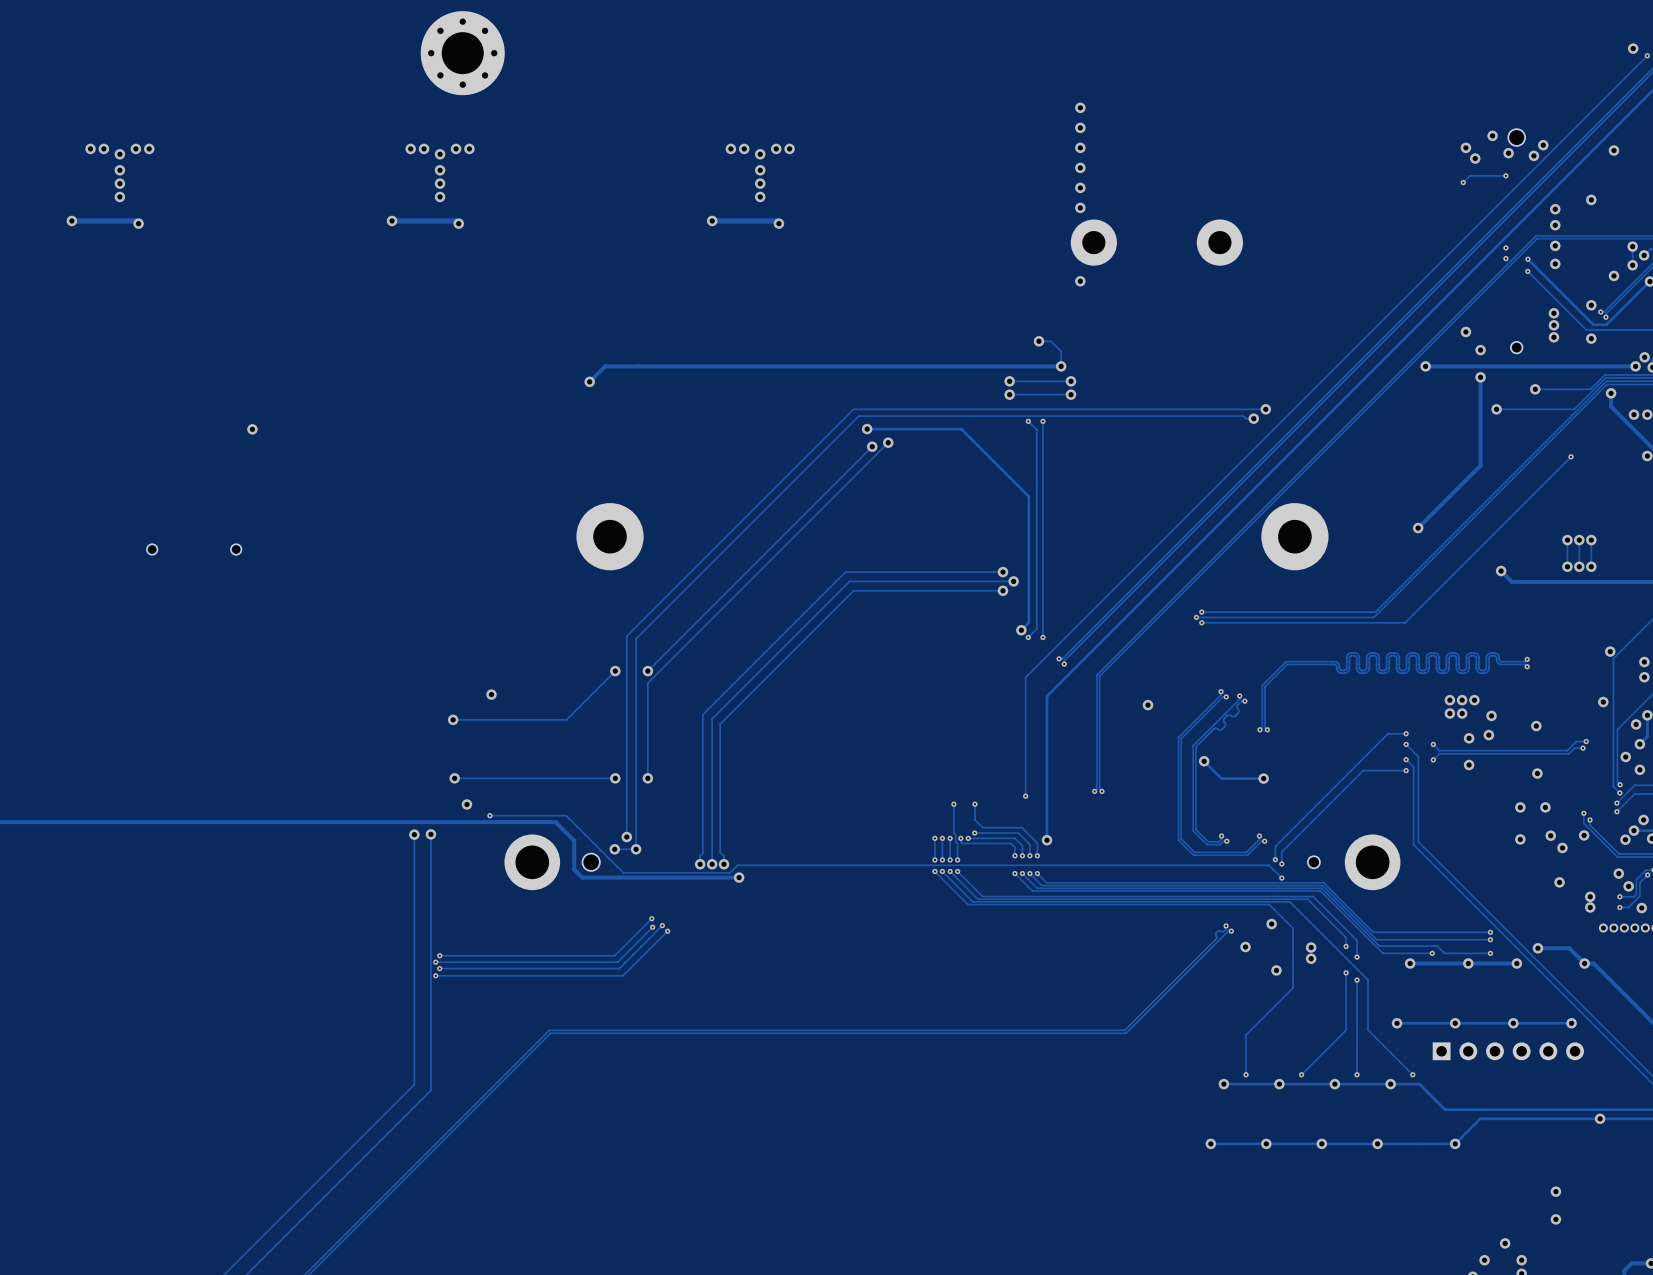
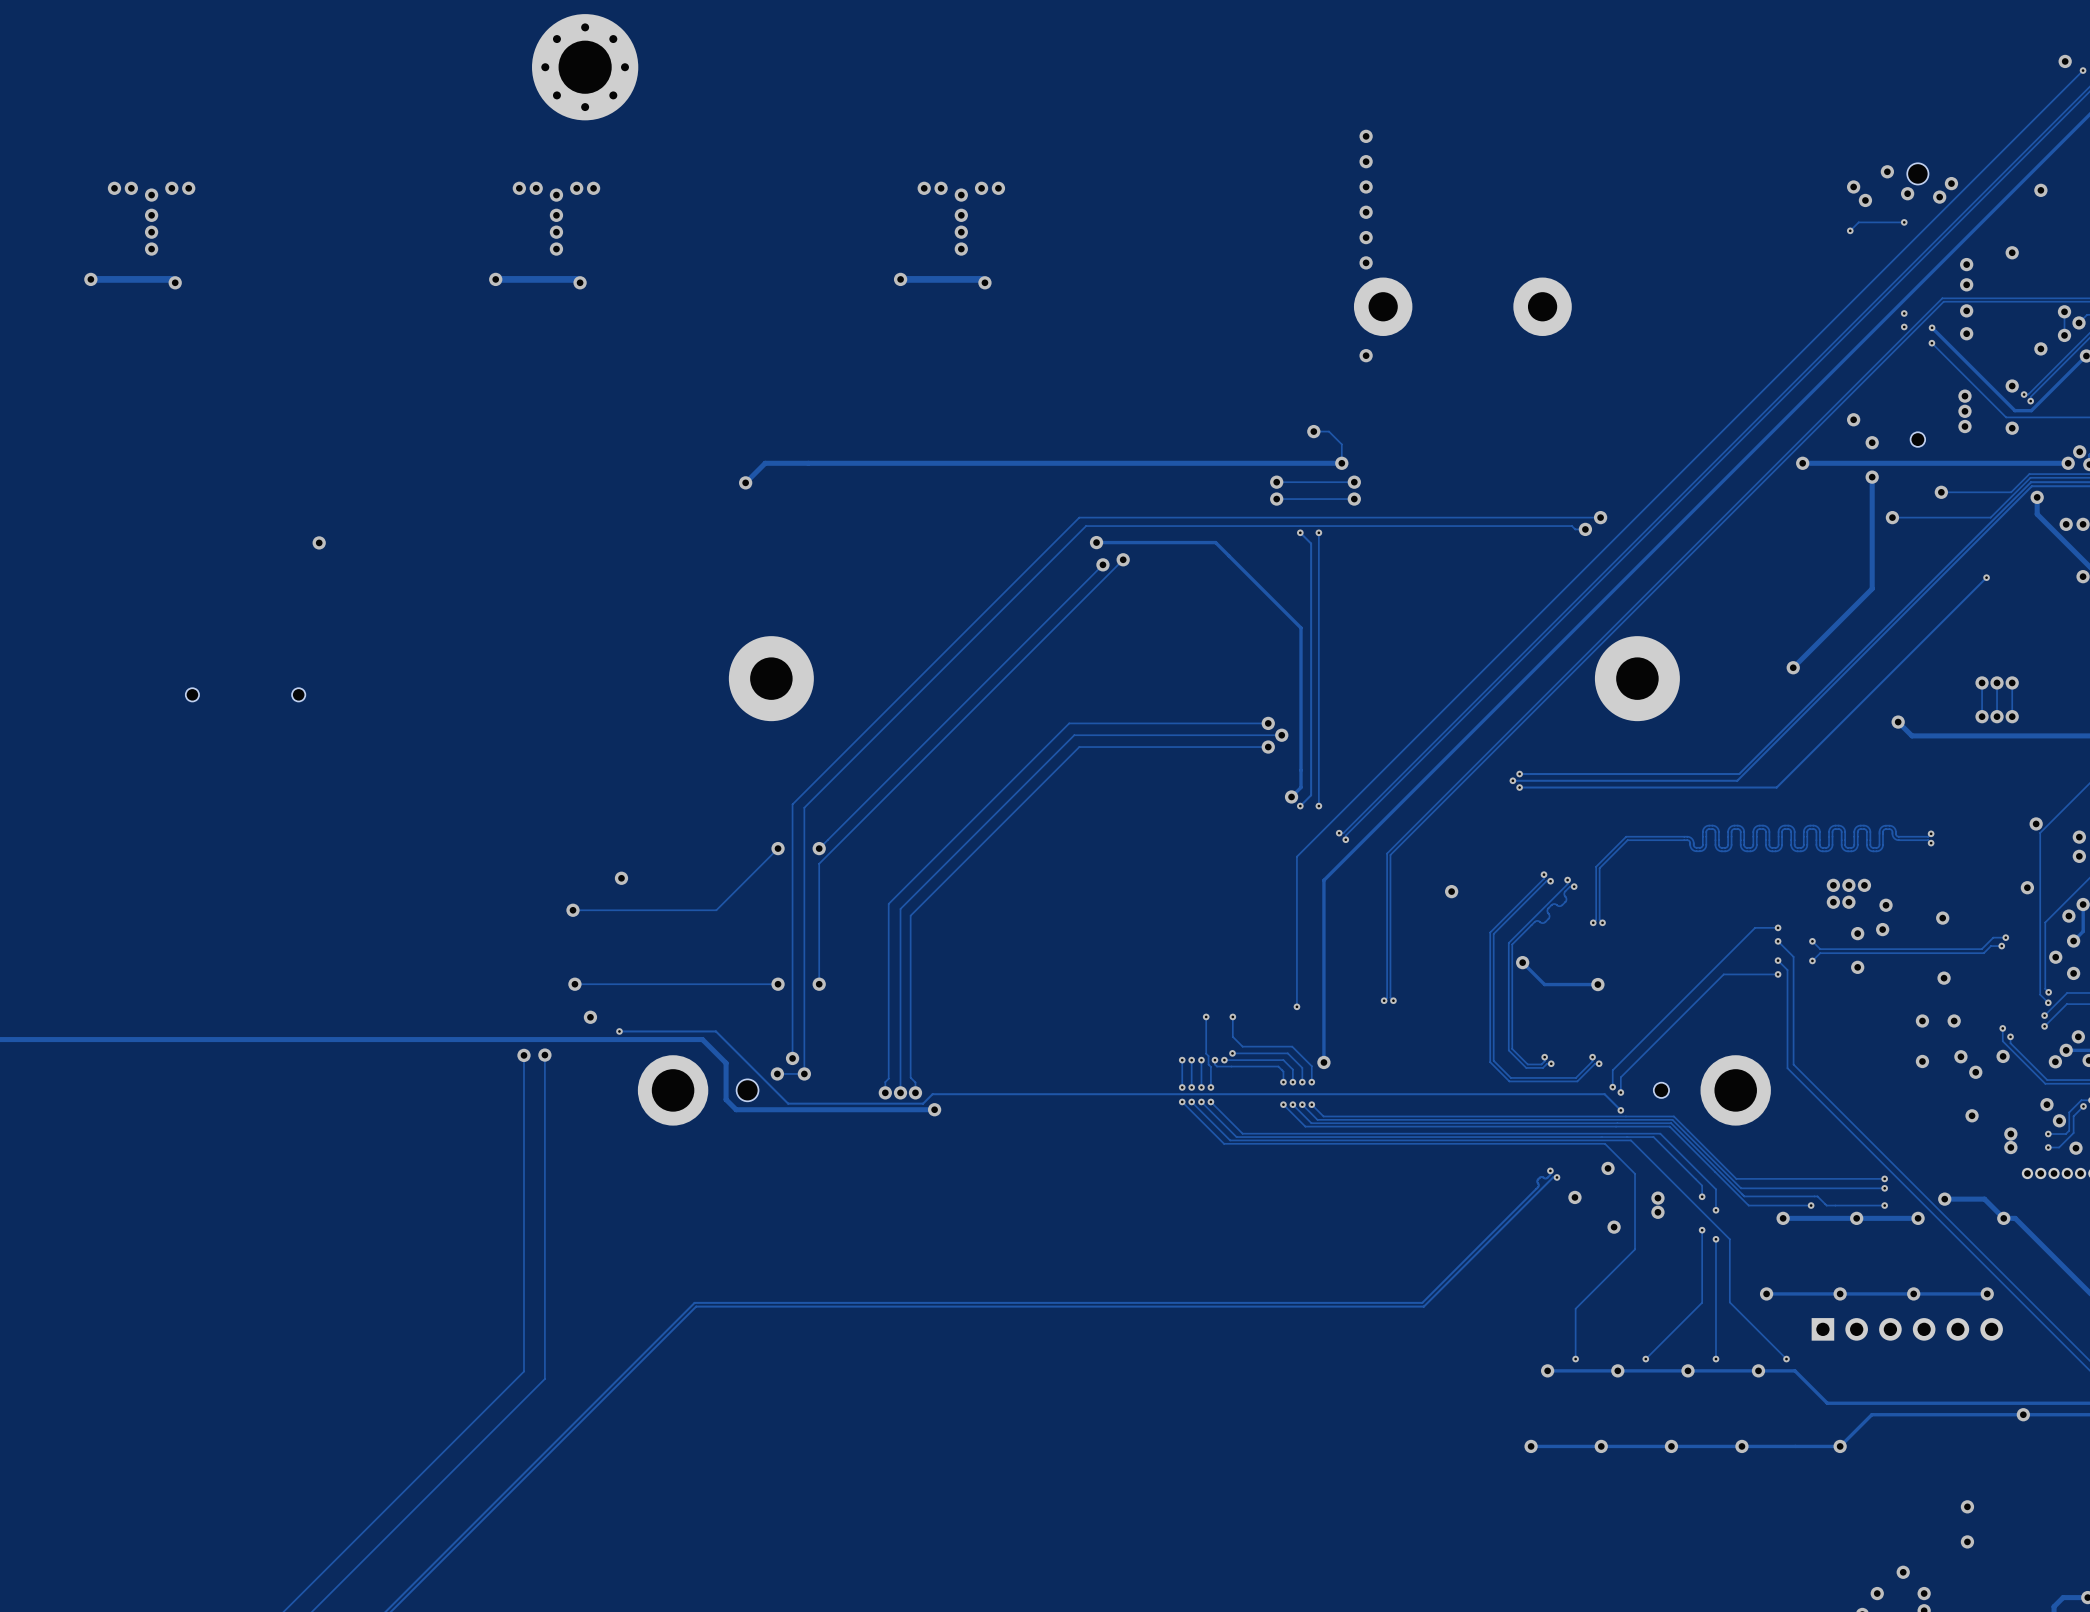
track: (651, 918) (614, 955) (439, 955) -> none
via: (651, 918) -> none
track: (662, 925) (619, 968) (439, 968) -> none
via: (662, 925) -> none
track: (652, 927) (617, 962) (435, 962) -> none
via: (652, 927) -> none
track: (667, 931) (623, 975) (435, 975) -> none
via: (667, 931) -> none
via: (439, 955) -> none
via: (435, 962) -> none
via: (439, 968) -> none
via: (435, 975) -> none

